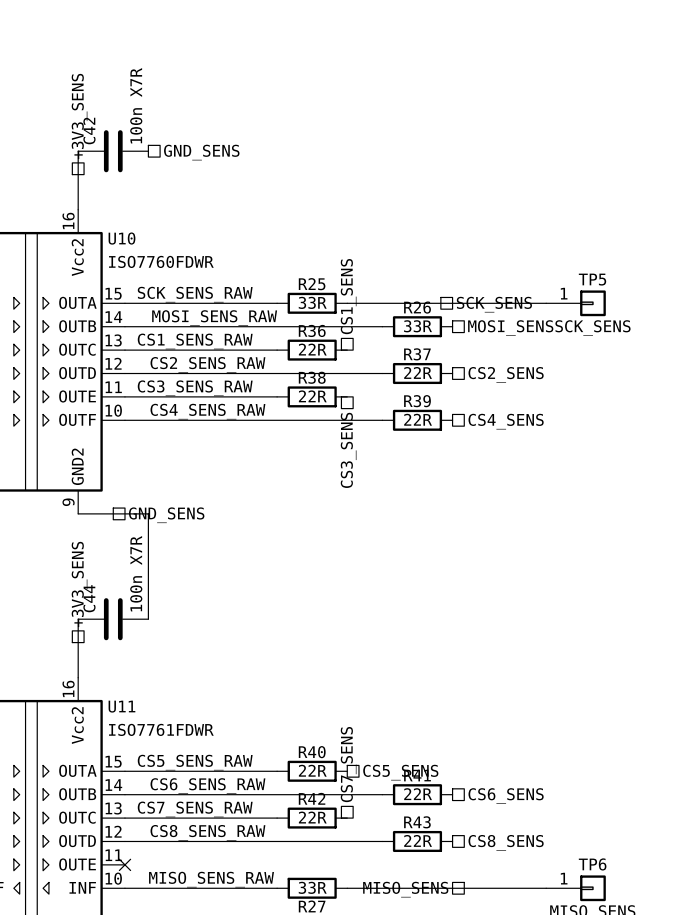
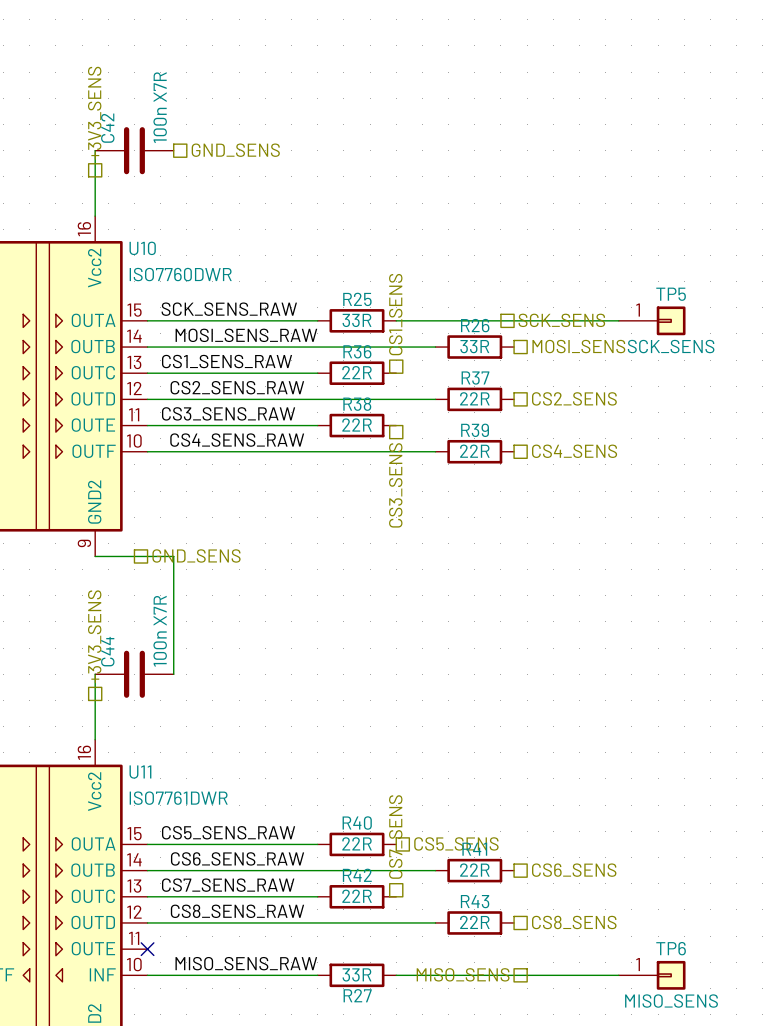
U10 value: ISO7760FDWR (161, 261) -> ISO7760DWR (180, 274)
U11 value: ISO7761FDWR (161, 729) -> ISO7761DWR (178, 798)

